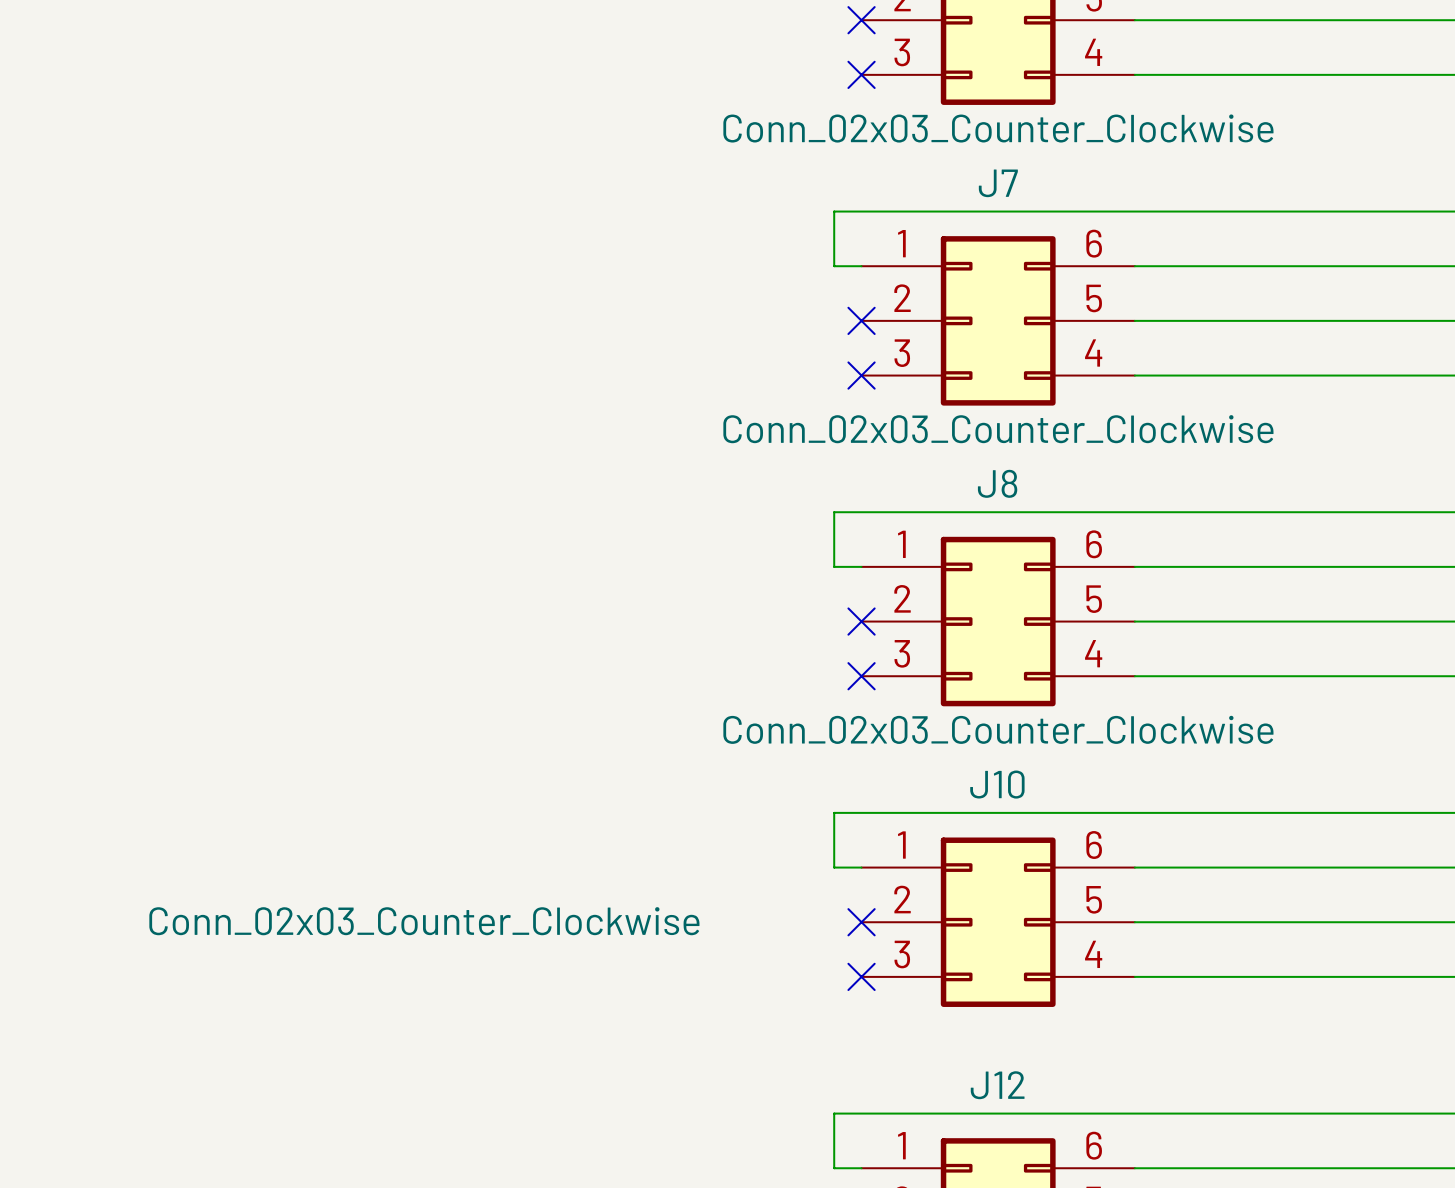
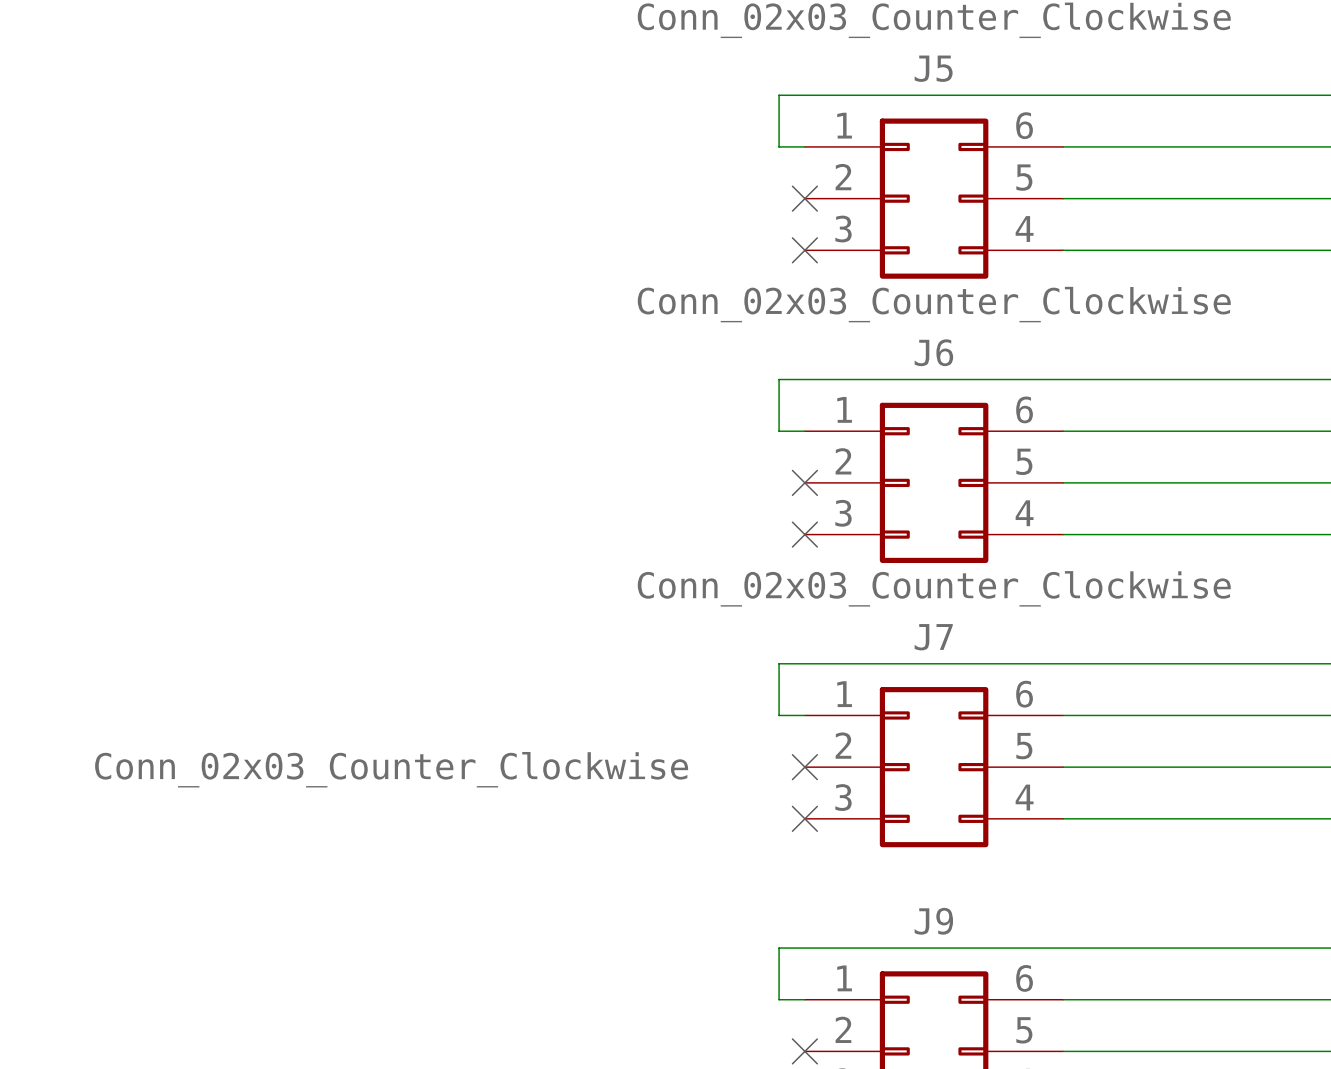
J7 name: J7 (998, 183) -> J5 (933, 68)
J8 name: J8 (997, 483) -> J6 (933, 352)
J10 name: J10 (997, 784) -> J7 (933, 637)
J12 name: J12 (997, 1085) -> J9 (933, 921)

